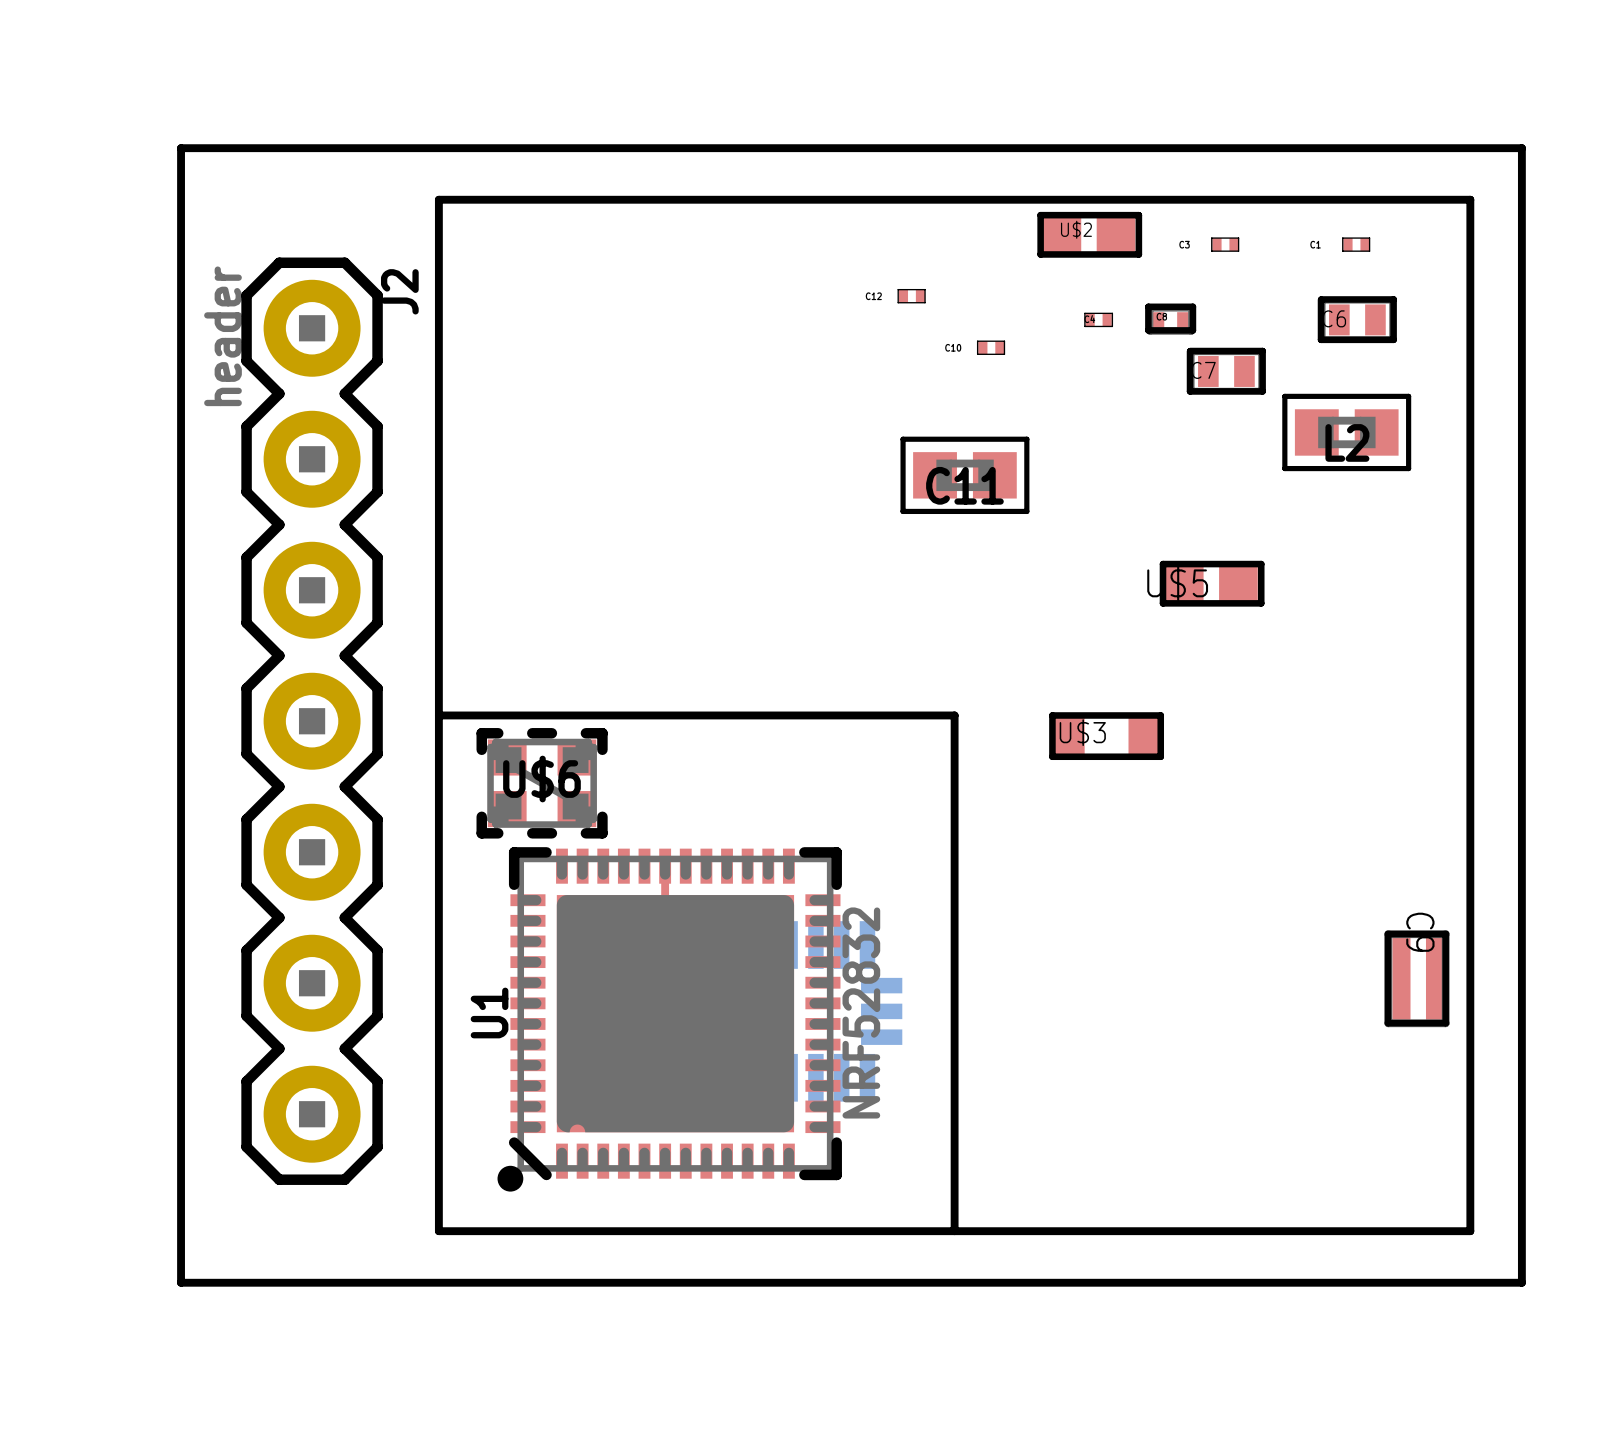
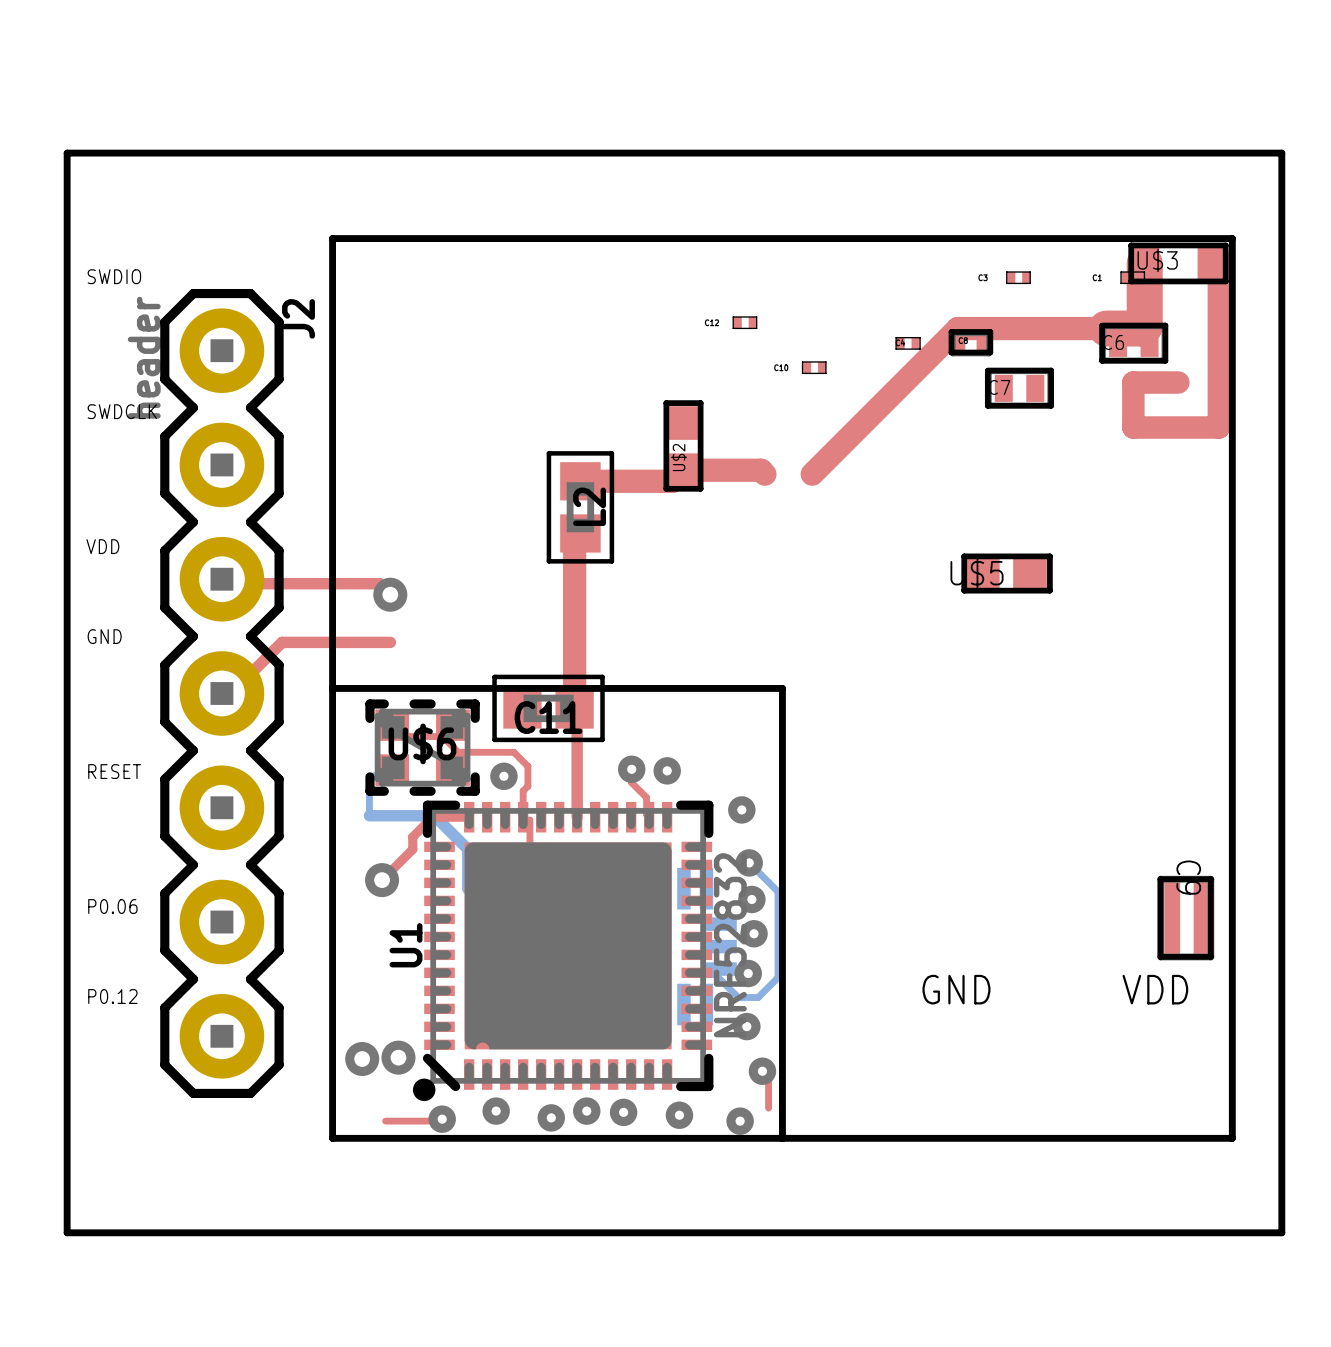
board edge: (181, 148) (181, 1282) (1521, 1282) (1521, 148) (181, 148) -> (67, 153) (67, 1232) (1281, 1232) (1281, 153) (67, 153)
top track: none -> (1218, 256) (1218, 427) (1133, 427) (1133, 382) (1178, 382)
top track: none -> (1144, 263) (1144, 326) (1142, 328) (957, 328) (812, 474)
U$2 rotation: 0° (1089, 234) -> 90° counterclockwise (683, 445)
U$2 position: (1089, 234) -> (683, 445)
text: none -> SWDIO (114, 276)
text: none -> SWDCLK (122, 411)
L2 rotation: 0° (1346, 432) -> 90° clockwise (580, 507)
L2 position: (1346, 432) -> (580, 507)
top track: none -> (764, 474) (761, 470) (683, 470) (672, 481) (580, 481)
C11 position: (964, 475) -> (548, 708)
top track: none -> (580, 533) (574, 539) (574, 708) (577, 710) (577, 817)
text: none -> VDD (102, 546)
top track: none -> (226, 583) (379, 583) (390, 594)
via: none -> (390, 594)
text: none -> GND (104, 636)
top track: none -> (390, 642) (282, 642) (226, 697)
U$3 position: (1106, 736) -> (1178, 263)
top track: none -> (407, 736) (442, 736) (458, 752) (513, 752) (527, 766) (527, 786) (523, 790) (523, 817)
top track: none -> (631, 769) (631, 782) (646, 797) (646, 814) (649, 817)
via: none -> (631, 769)
via: none -> (667, 770)
text: none -> RESET (114, 771)
bottom track: none -> (374, 775) (369, 780) (369, 815) (434, 815) (467, 849) (467, 888)
via: none -> (503, 776)
via: none -> (741, 809)
top track: none -> (469, 817) (432, 817) (412, 836) (412, 849) (382, 880)
bottom track: none -> (749, 862) (778, 891) (778, 977) (758, 997) (738, 997) (715, 974) (709, 974)
via: none -> (749, 862)
via: none -> (382, 880)
via: none -> (751, 899)
text: none -> P0.06 (112, 906)
via: none -> (754, 933)
U1 position: (669, 1019) -> (563, 950)
via: none -> (748, 973)
text: none -> GND (956, 989)
text: none -> VDD (1155, 989)
text: none -> P0.12 (112, 996)
via: none -> (746, 1026)
via: none -> (398, 1057)
via: none -> (362, 1059)
top track: none -> (762, 1071) (768, 1077) (768, 1108)
via: none -> (762, 1071)
via: none -> (496, 1111)
via: none -> (586, 1111)
via: none -> (623, 1112)
via: none -> (679, 1115)
via: none -> (551, 1117)
top track: none -> (442, 1119) (436, 1121) (385, 1121)
via: none -> (442, 1119)
via: none -> (740, 1121)

